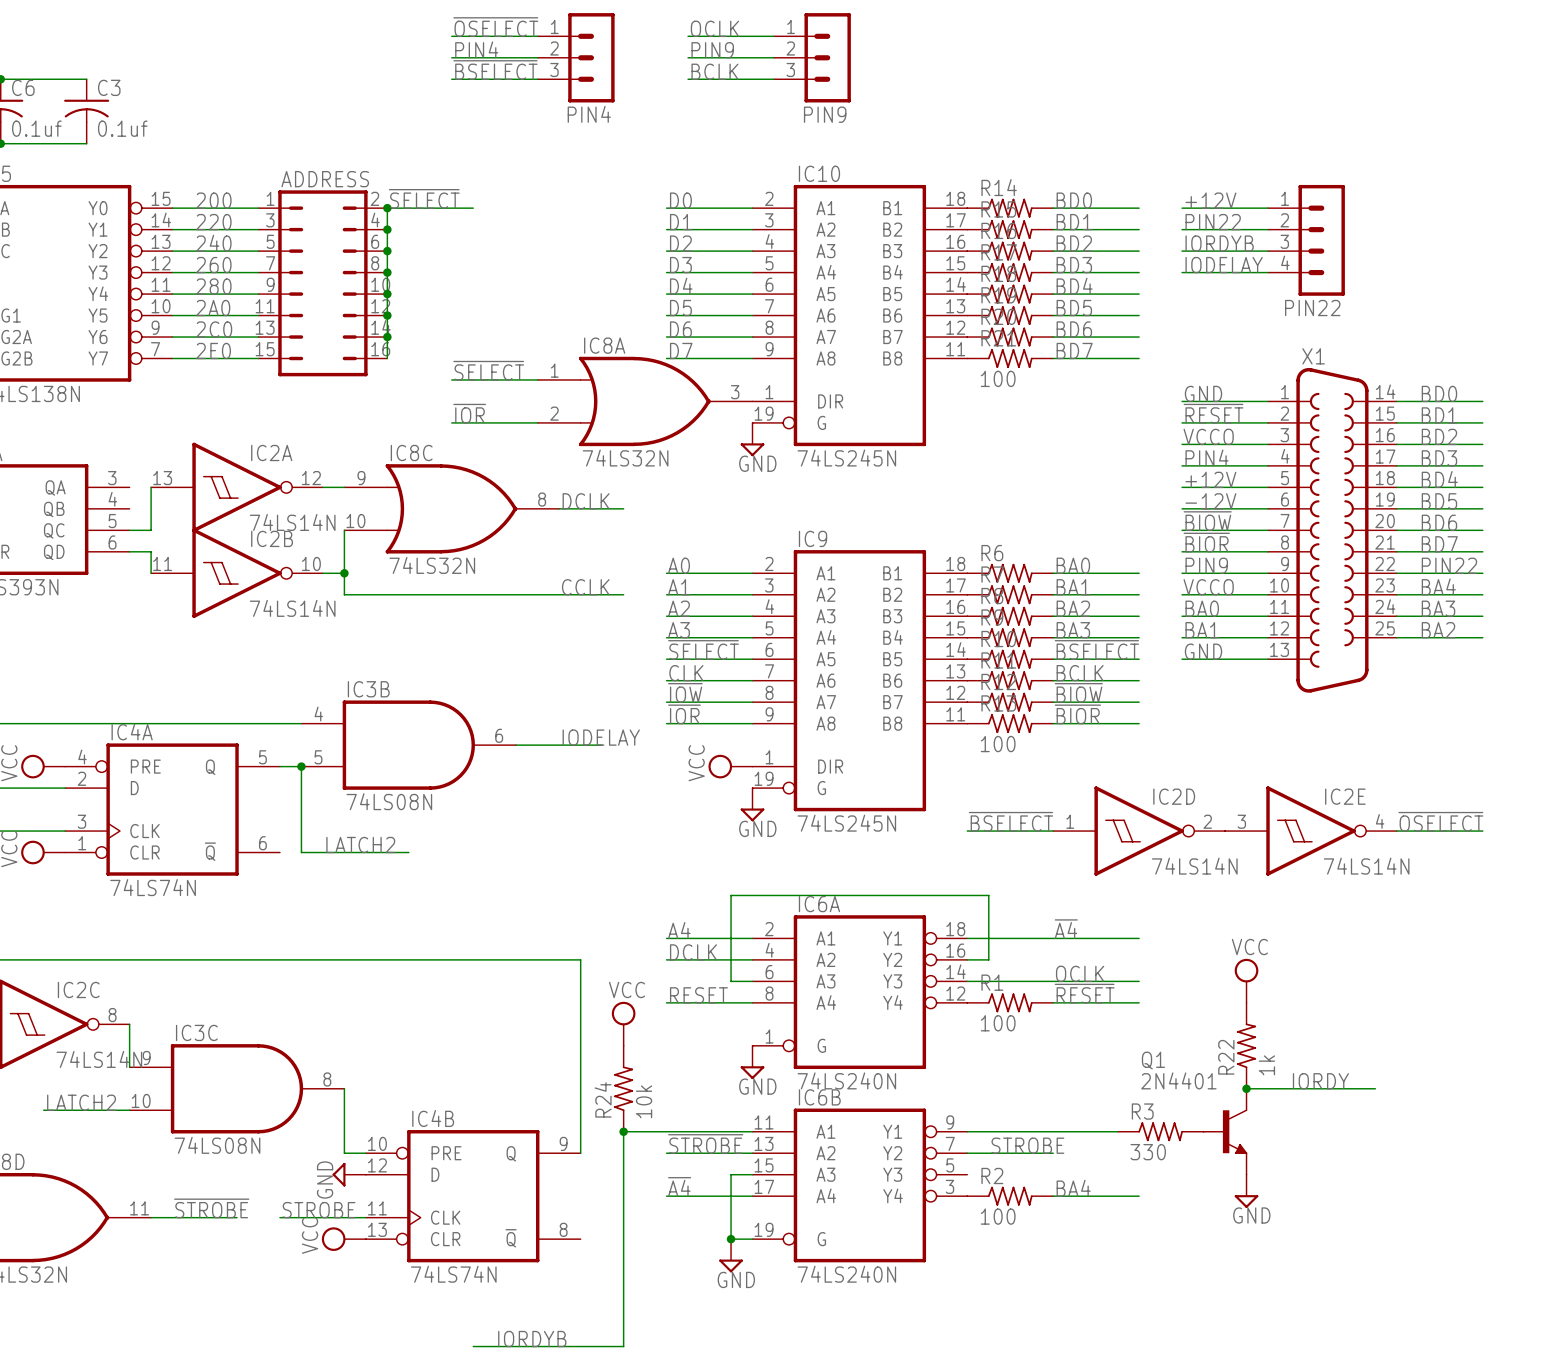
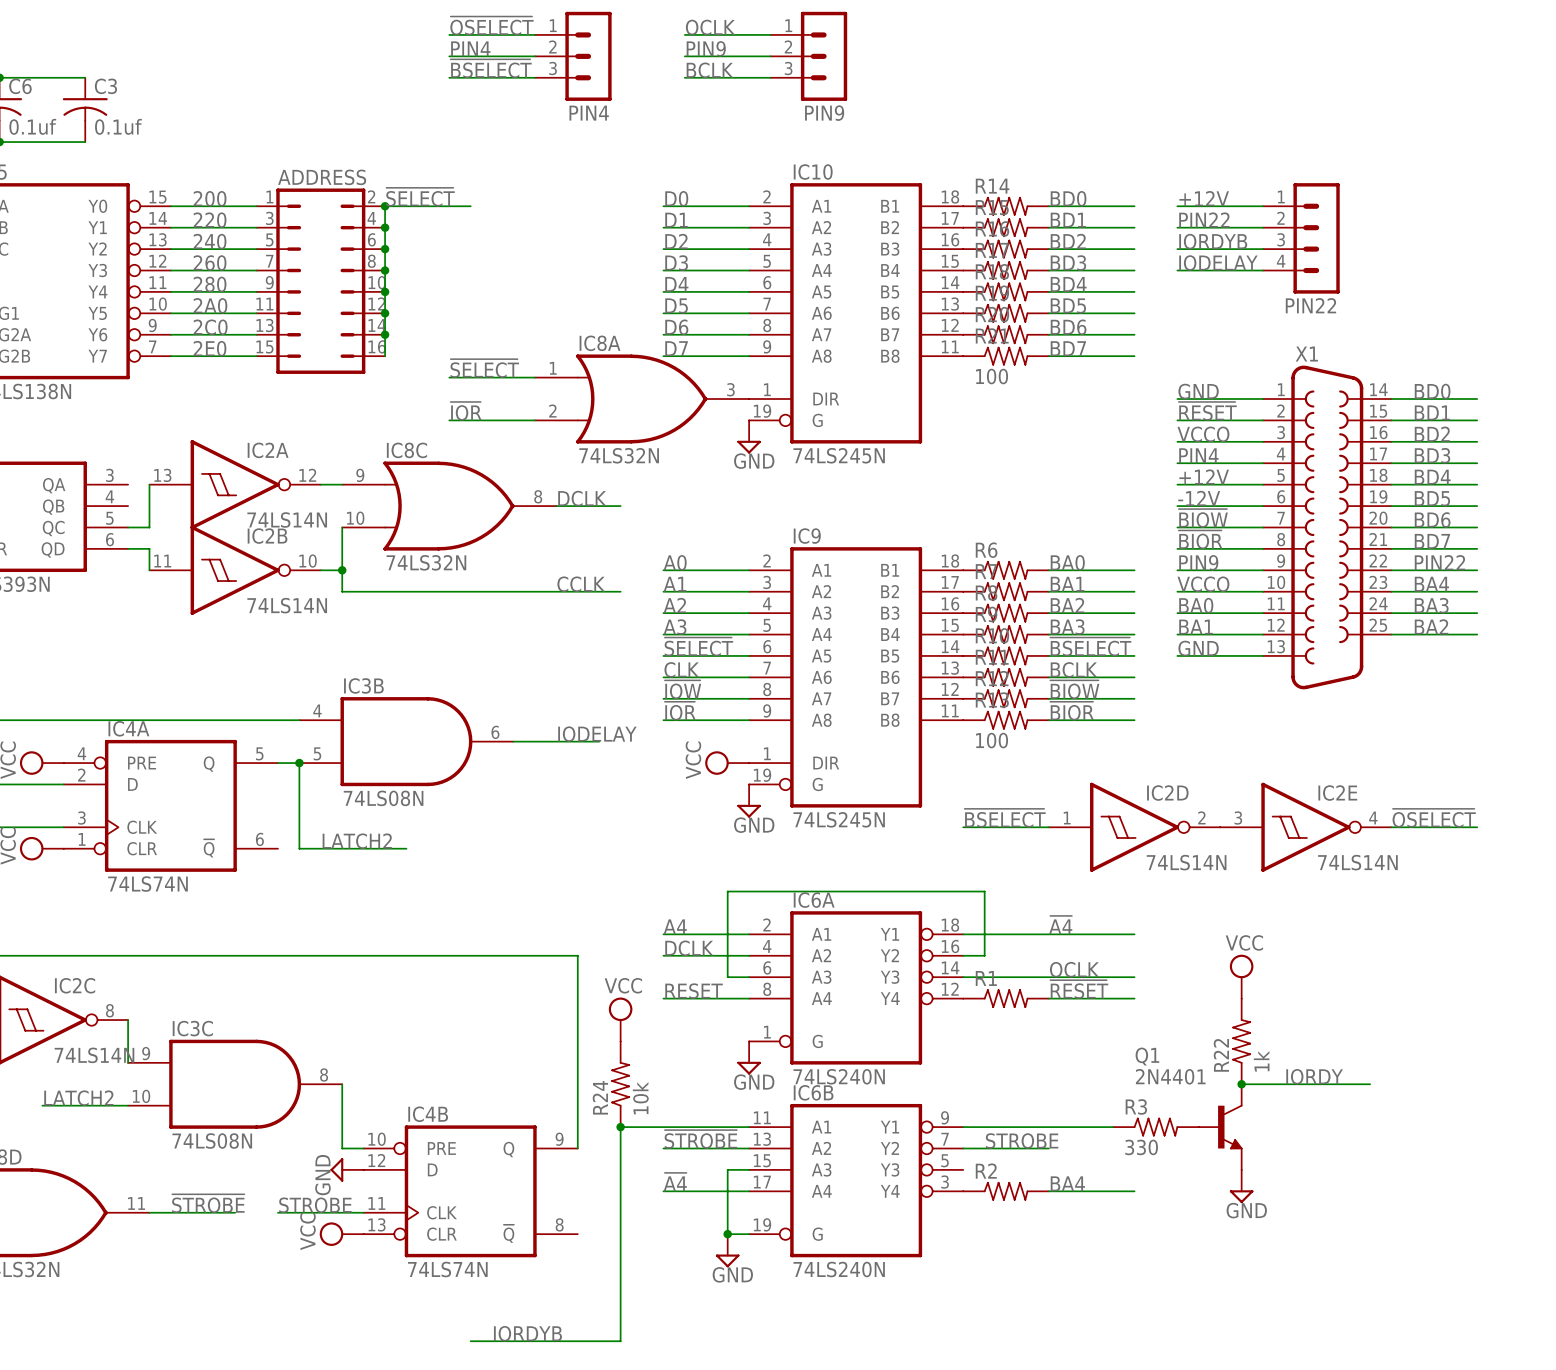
R1 value: 100 (998, 1023) -> none
R2 value: 100 (998, 1216) -> none

